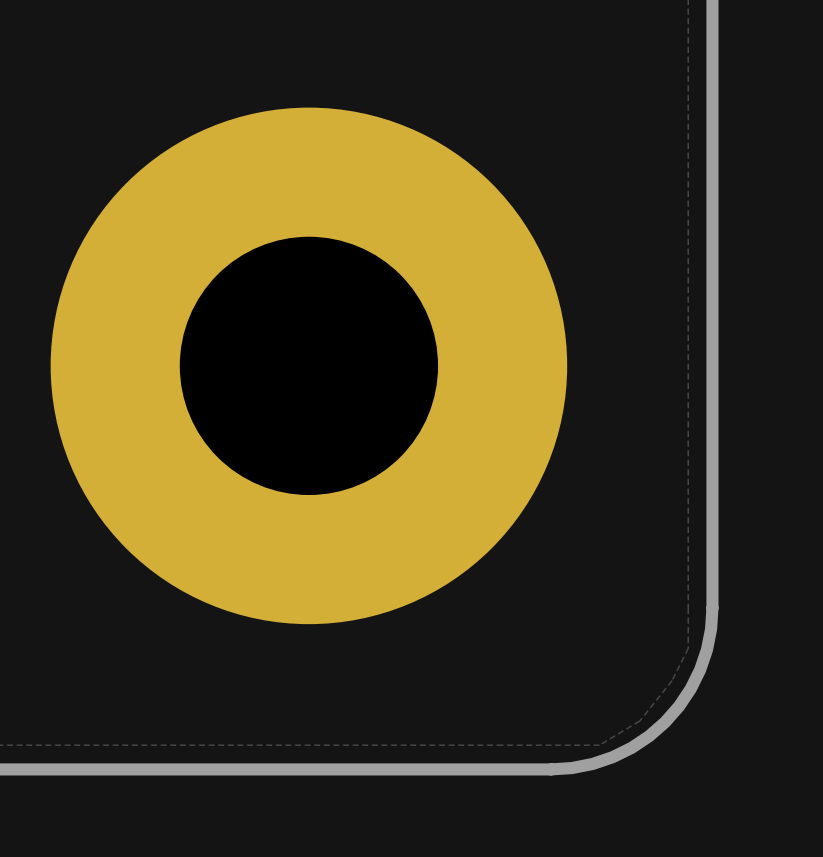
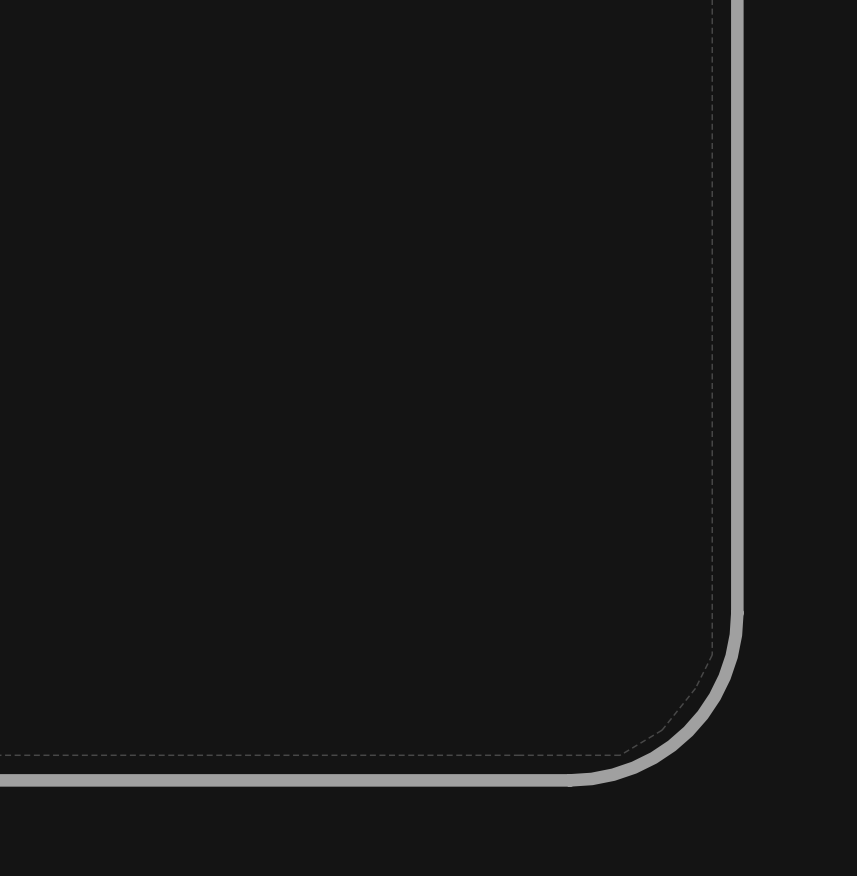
part: (308, 365) -> none

